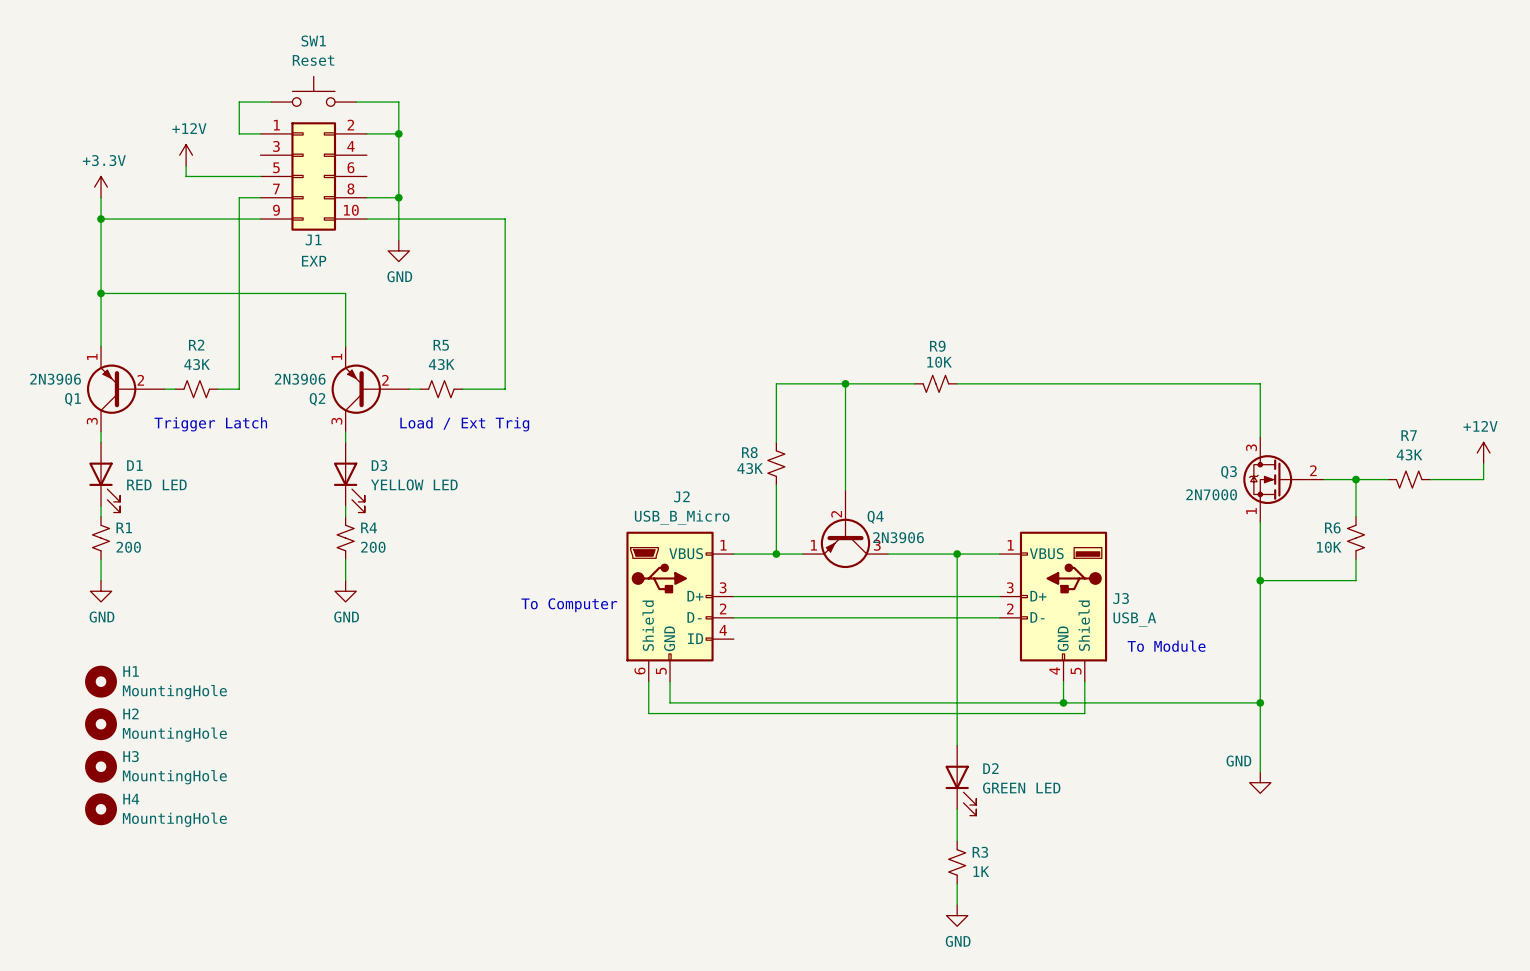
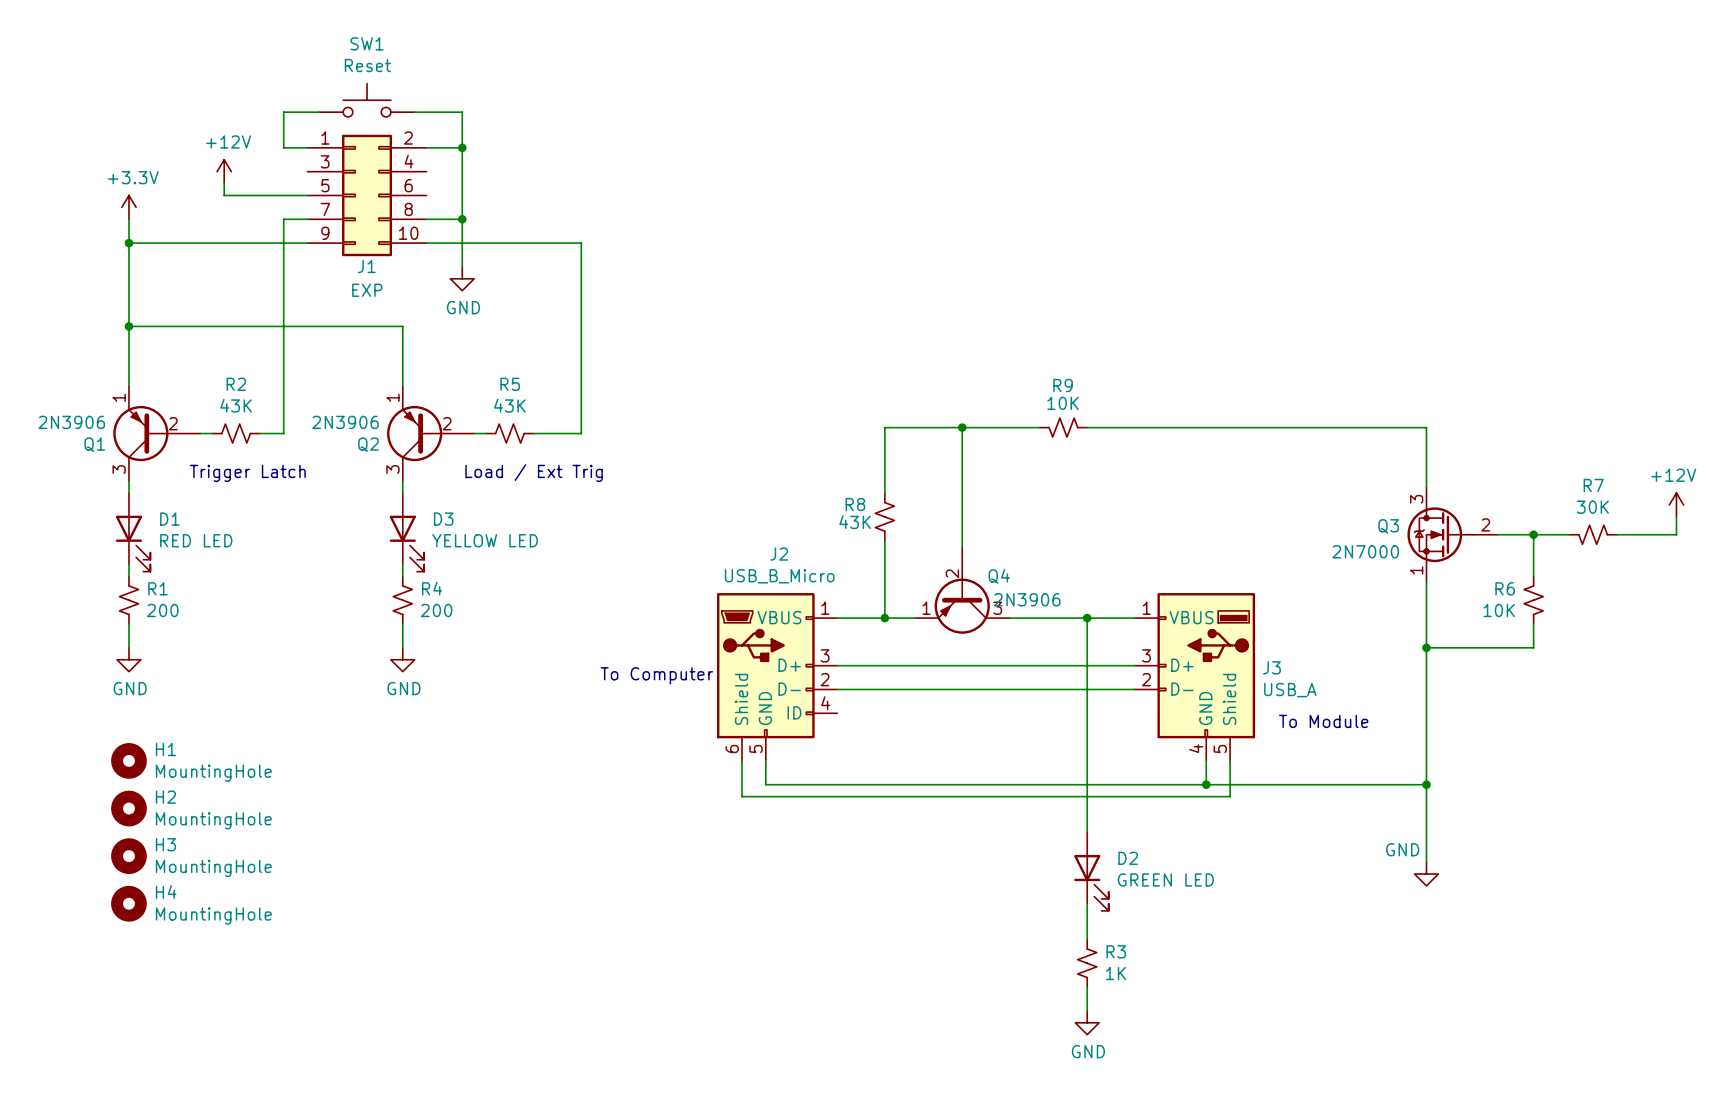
R7 value: 43K (1409, 454) -> 30K (1592, 507)

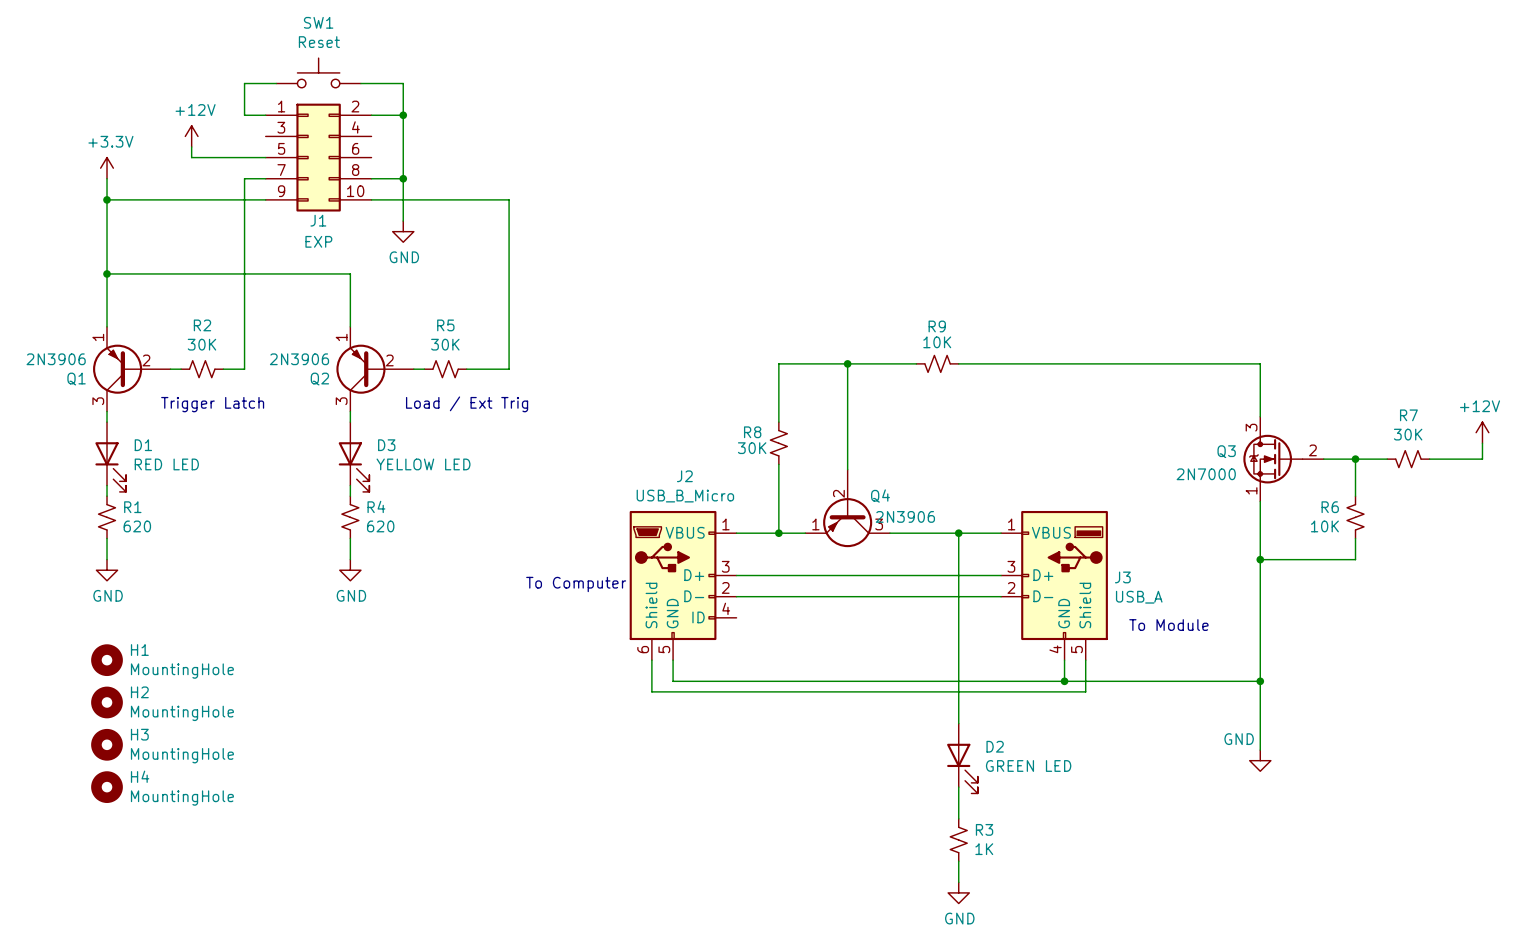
R2 value: 43K (236, 405) -> 30K (201, 344)
R5 value: 43K (509, 405) -> 30K (445, 344)
R8 value: 43K (855, 522) -> 30K (752, 448)
R1 value: 200 (162, 610) -> 620 (137, 526)
R4 value: 200 (436, 610) -> 620 (380, 526)

